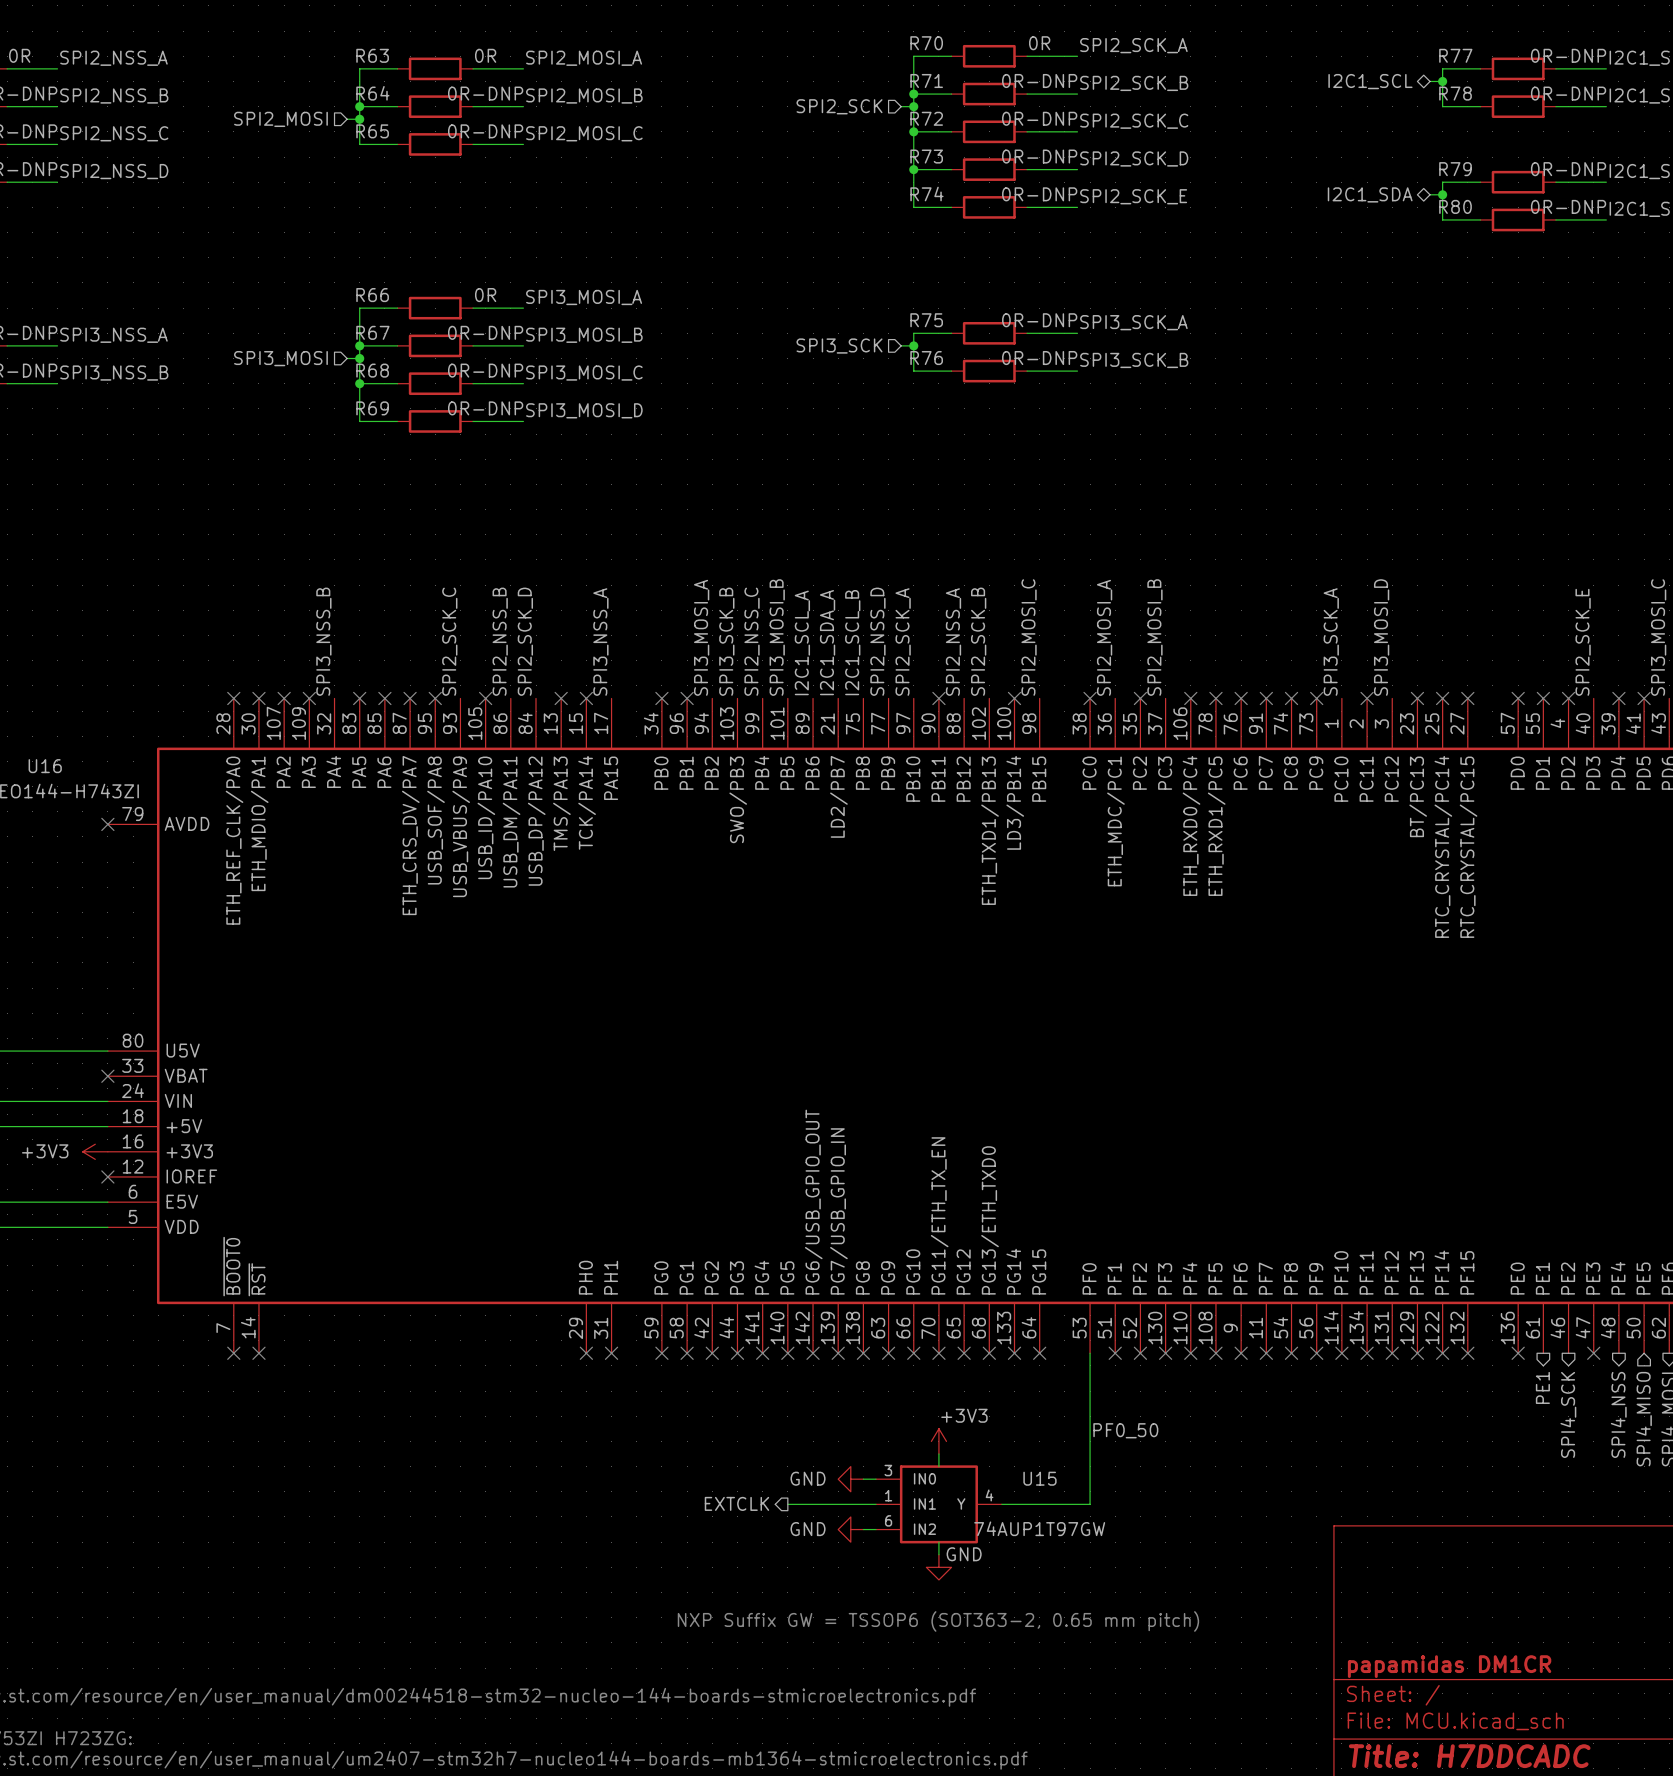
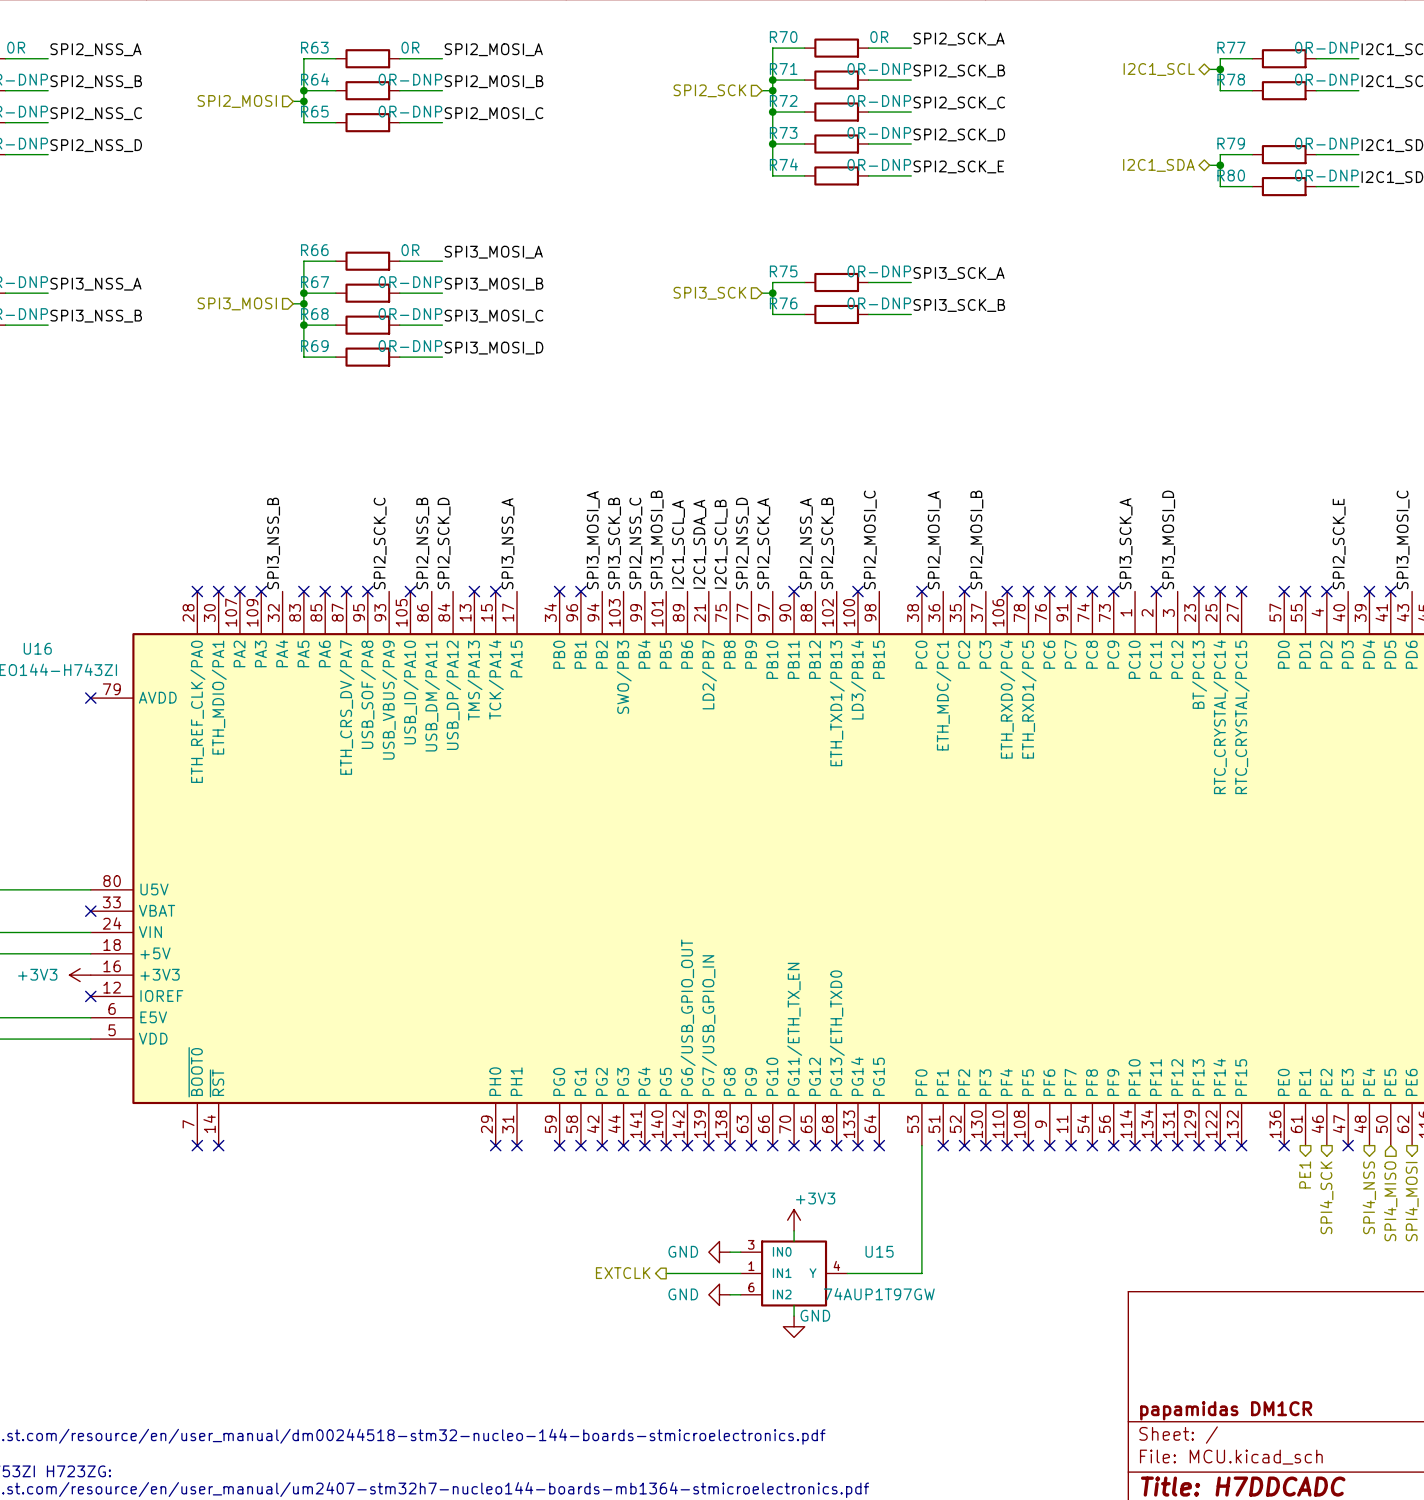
label: PF0_50 (1125, 1430) -> none
text: NXP Suffix GW = TSSOP6 (SOT363-2, 0.65 mm pitch) (938, 1621) -> none

